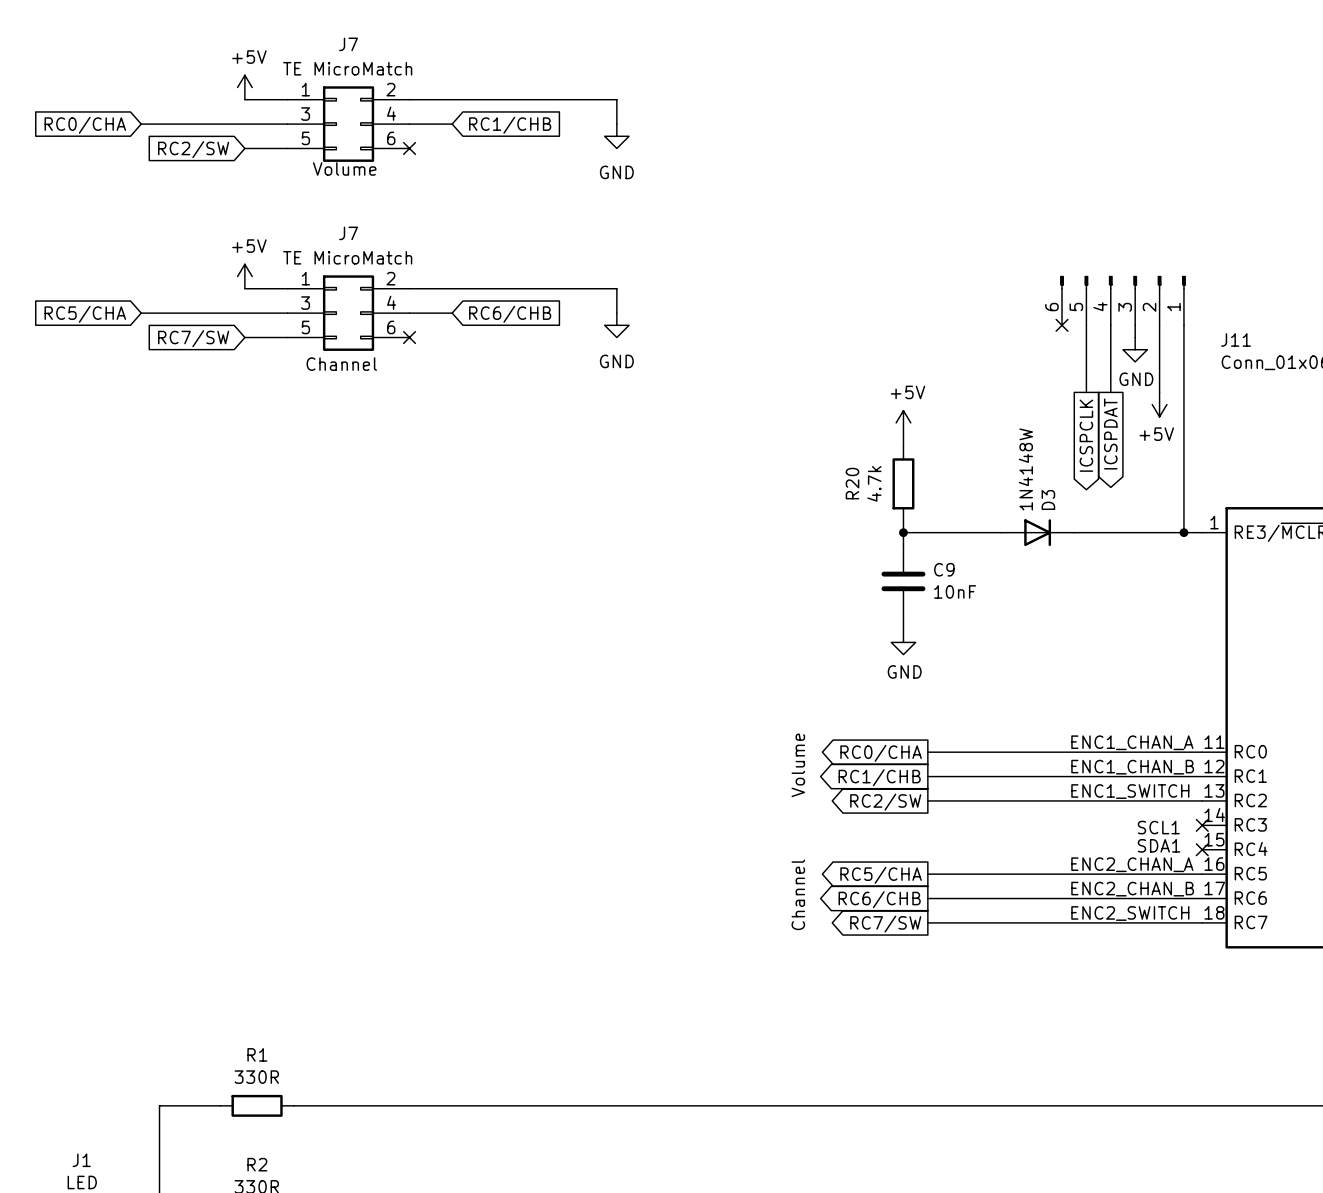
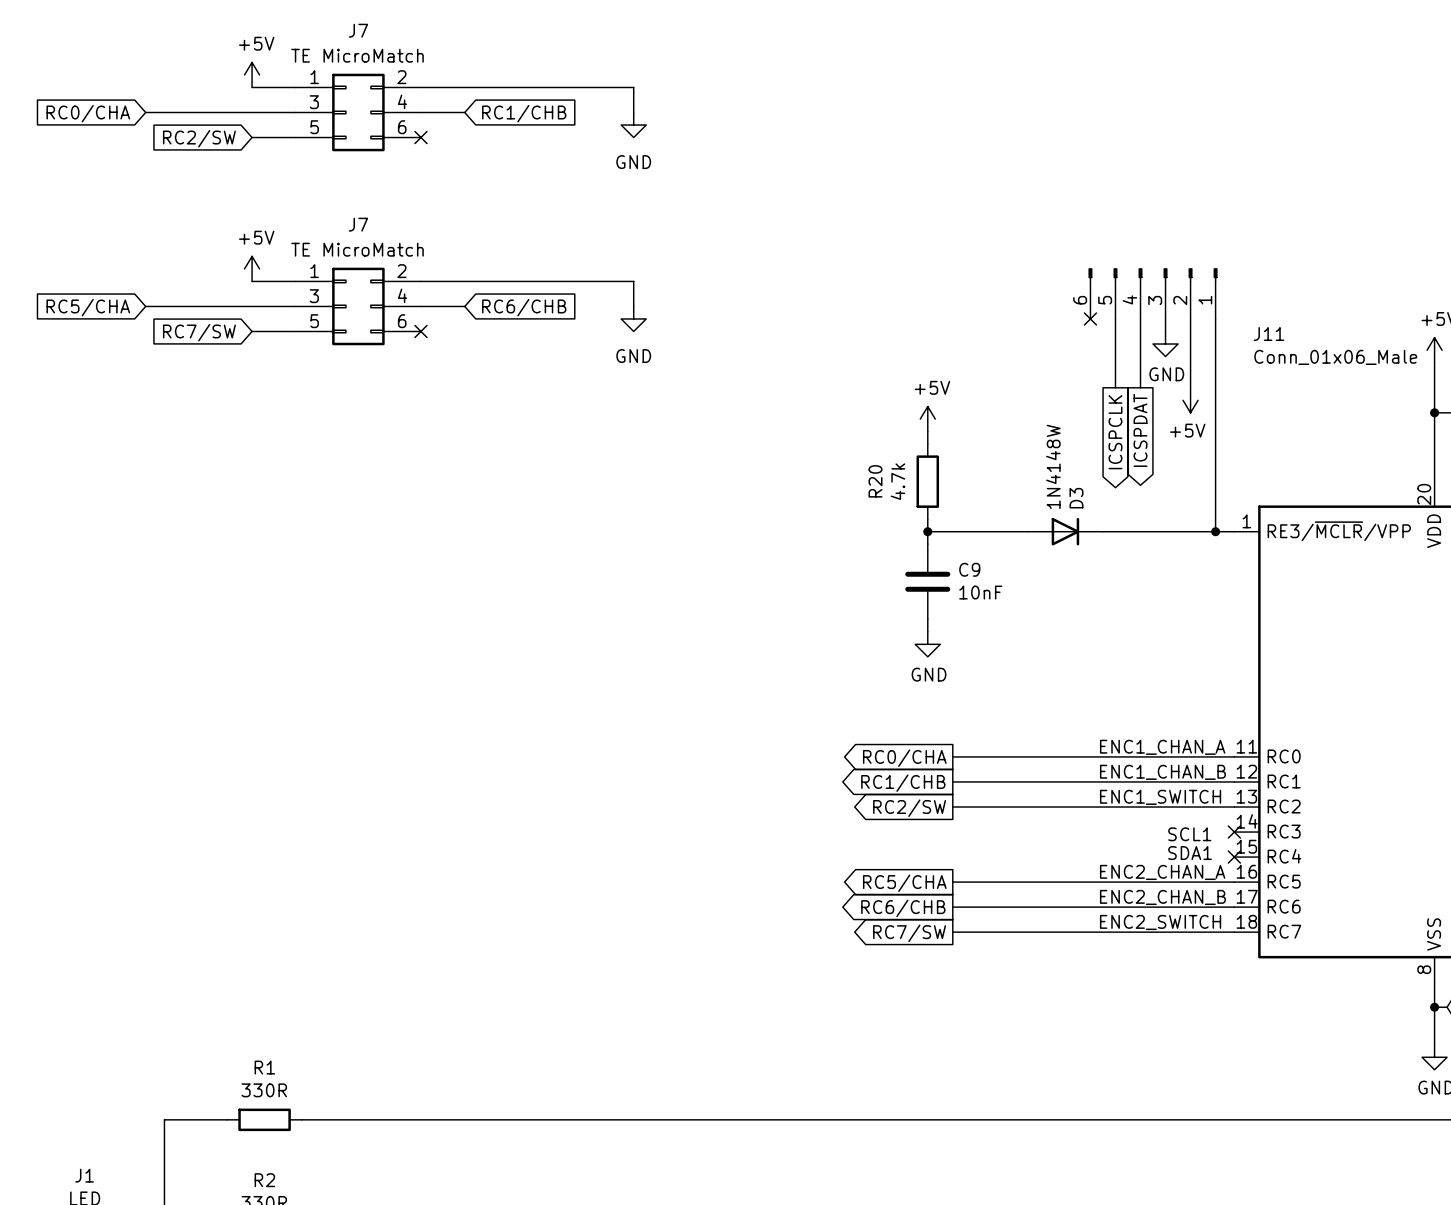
text: Volume (344, 168) -> none
text: Channel (341, 364) -> none
text: Volume (798, 765) -> none
text: Channel (798, 894) -> none

